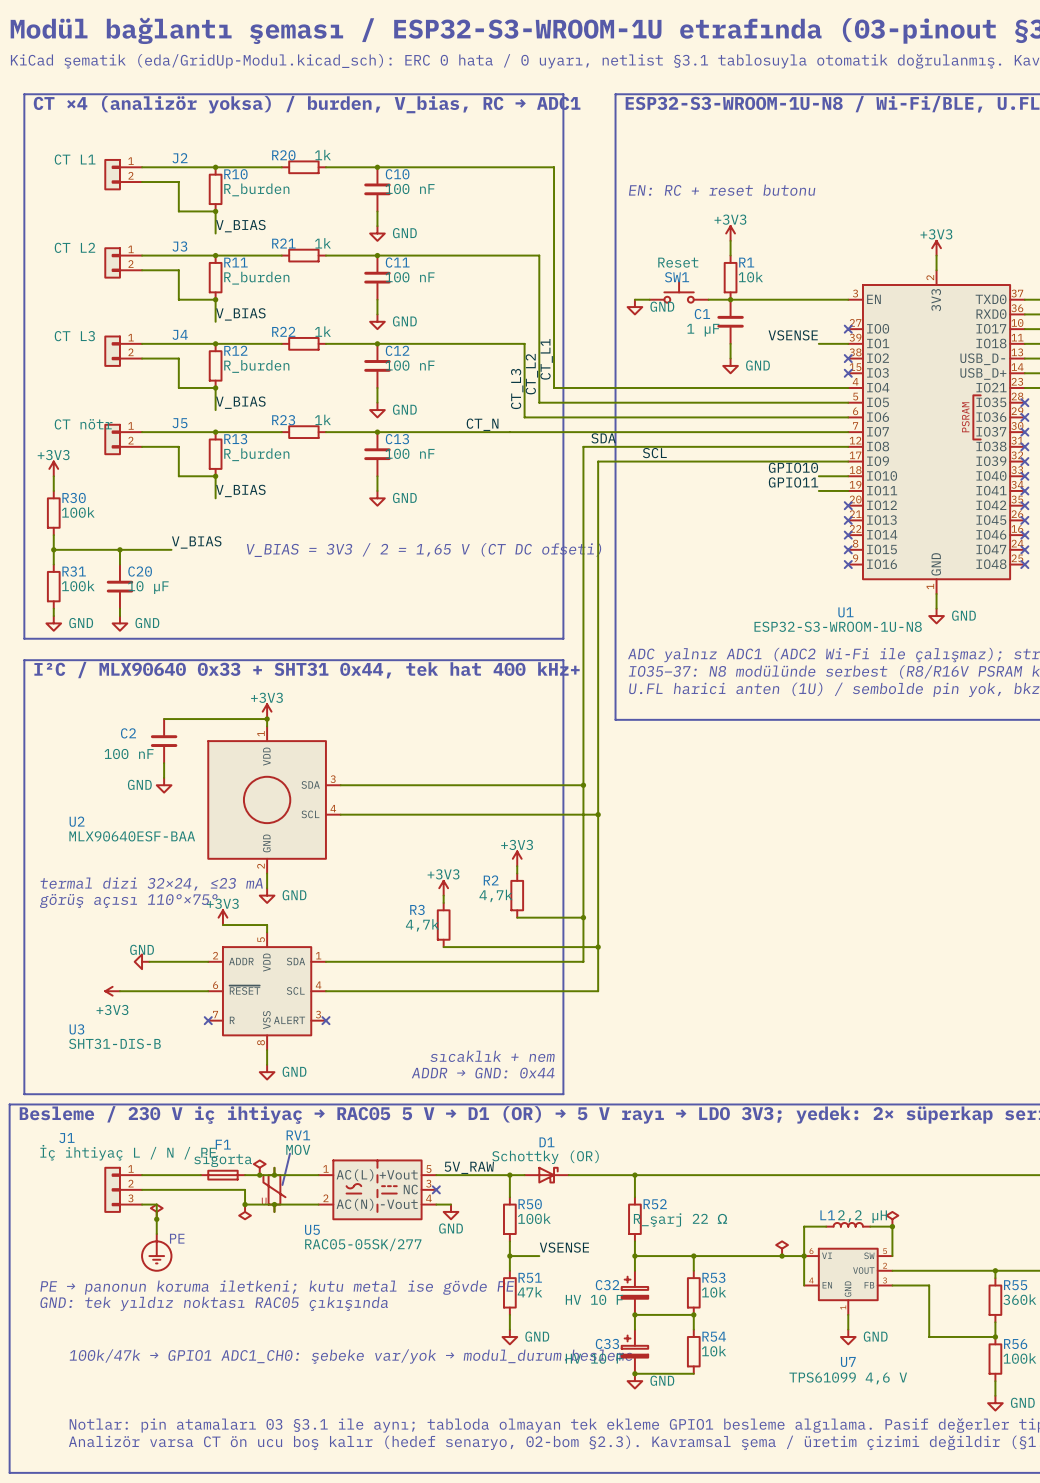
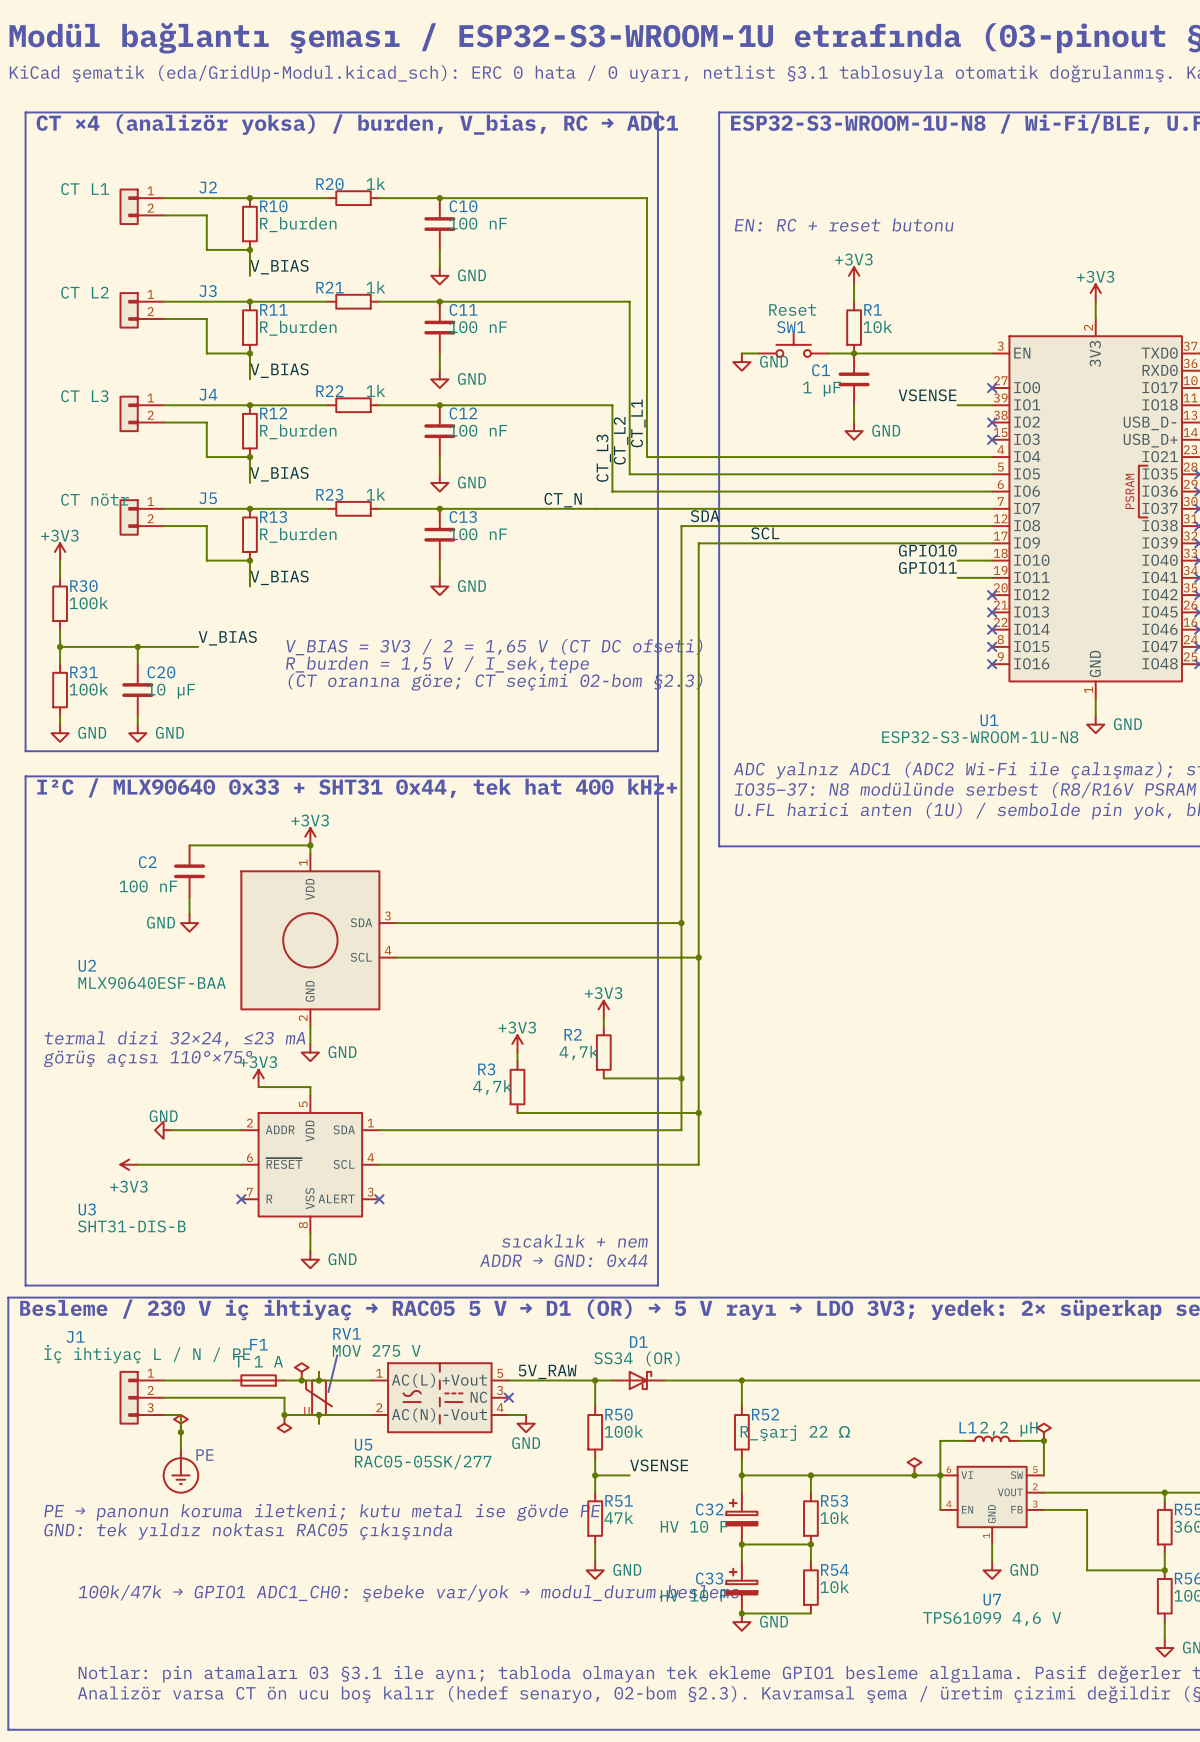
text: none -> R_burden = 1,5 V / I_sek,tepe (437, 664)
text: none -> (CT oranına göre; CT seçimi 02-bom §2.3) (495, 682)
RV1 value: MOV (298, 1149) -> MOV 275 V (376, 1350)
D1 value: Schottky (OR) (545, 1157) -> SS34 (OR) (636, 1358)
F1 value: sigorta (223, 1160) -> T 1 A (258, 1361)

